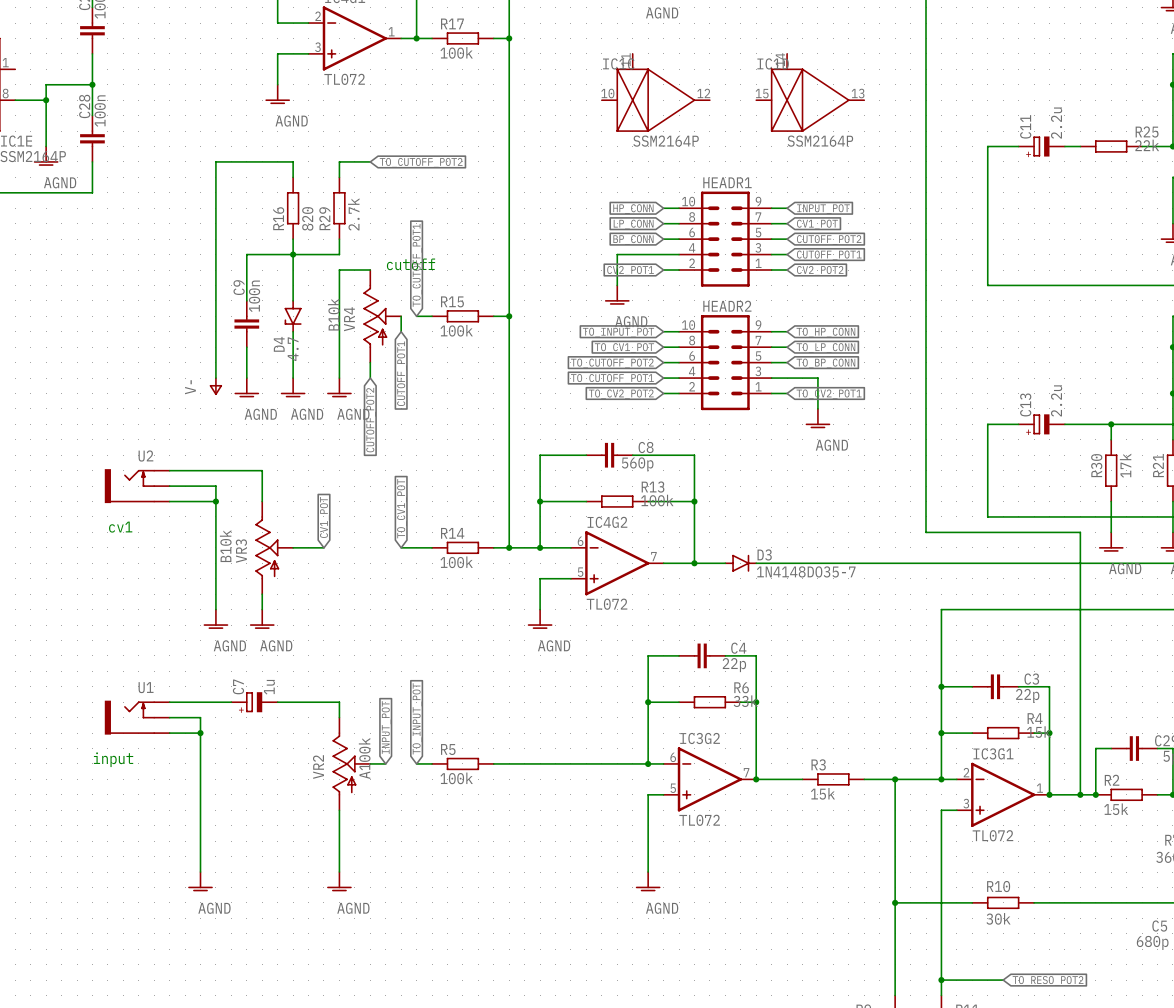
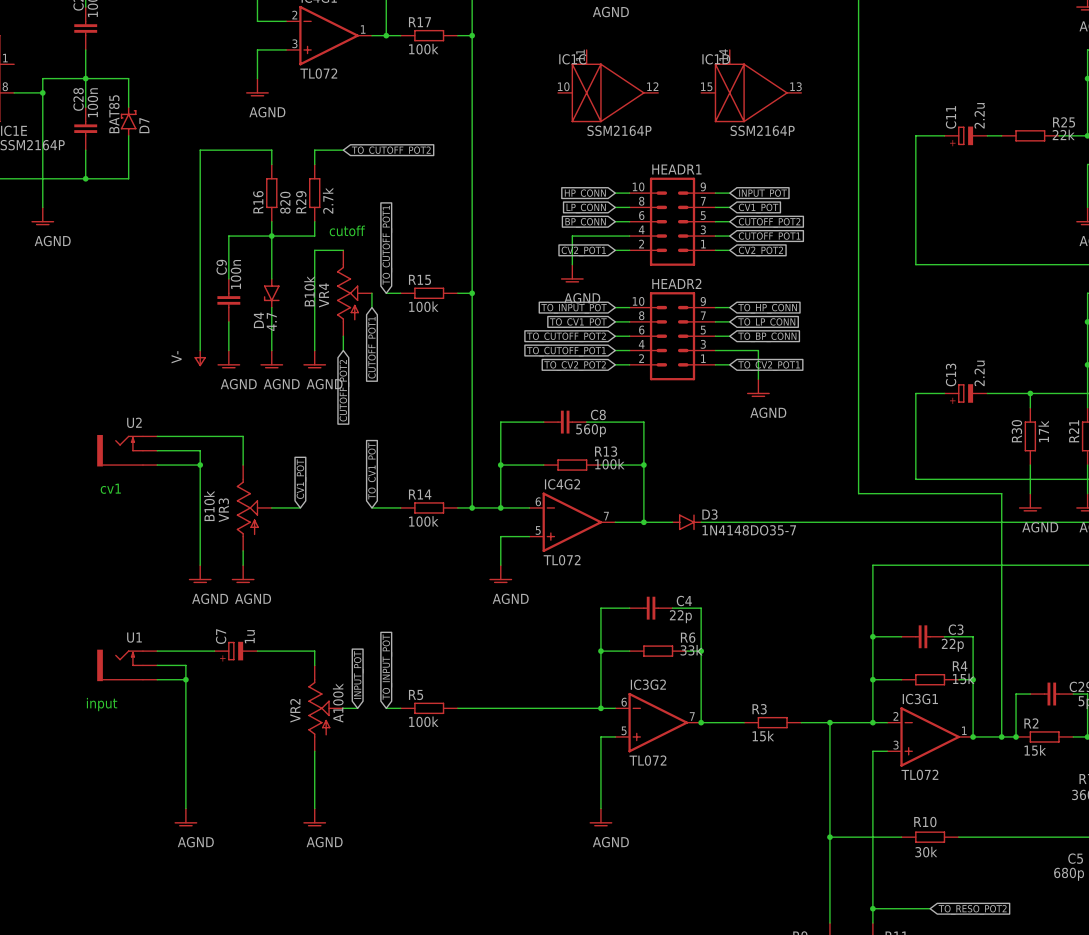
wire: none -> (85, 78) (128, 78) (128, 107)
D7: none -> BAT85 (128, 121)
wire: none -> (42, 135) (42, 207)
wire: none -> (128, 135) (128, 178) (85, 178)
power symbol position: AGND (46, 156) -> AGND (42, 216)
junction: none -> (85, 178)
text position: cutoff (411, 264) -> cutoff (347, 230)

